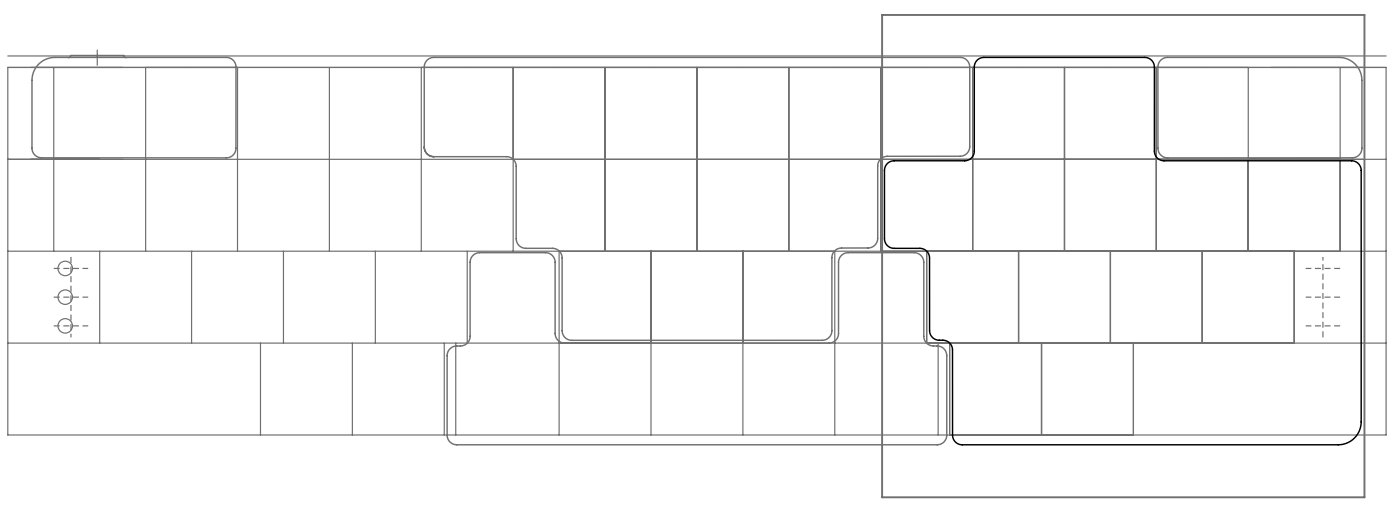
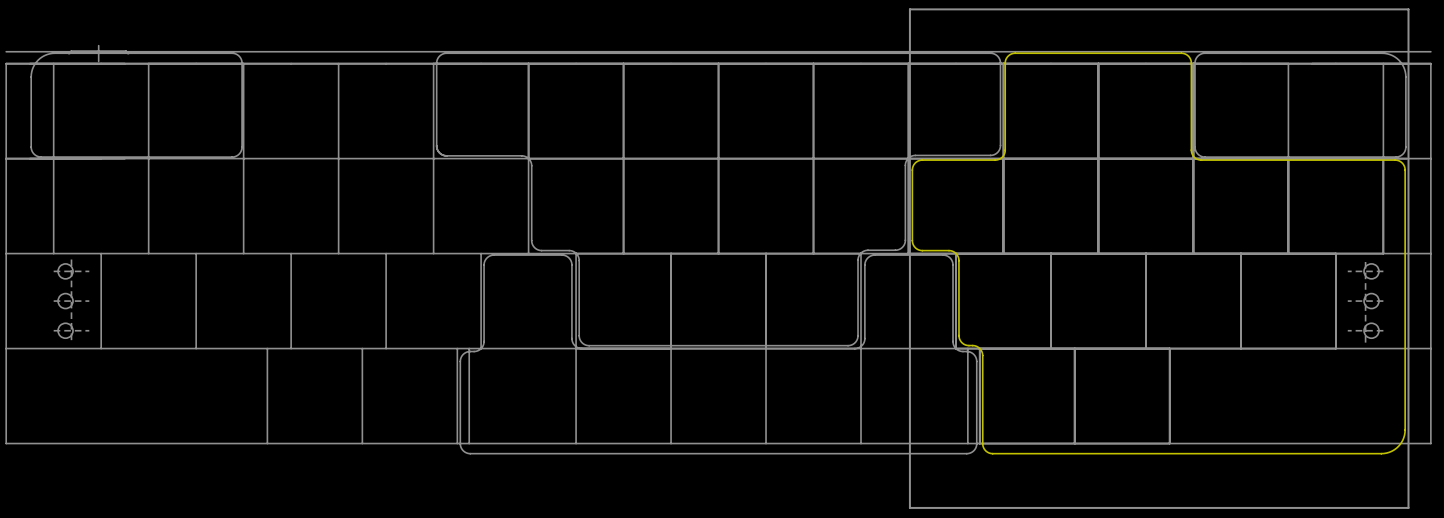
drawing shape: [7, 49, 1387, 446] -> [5, 45, 1432, 455]

